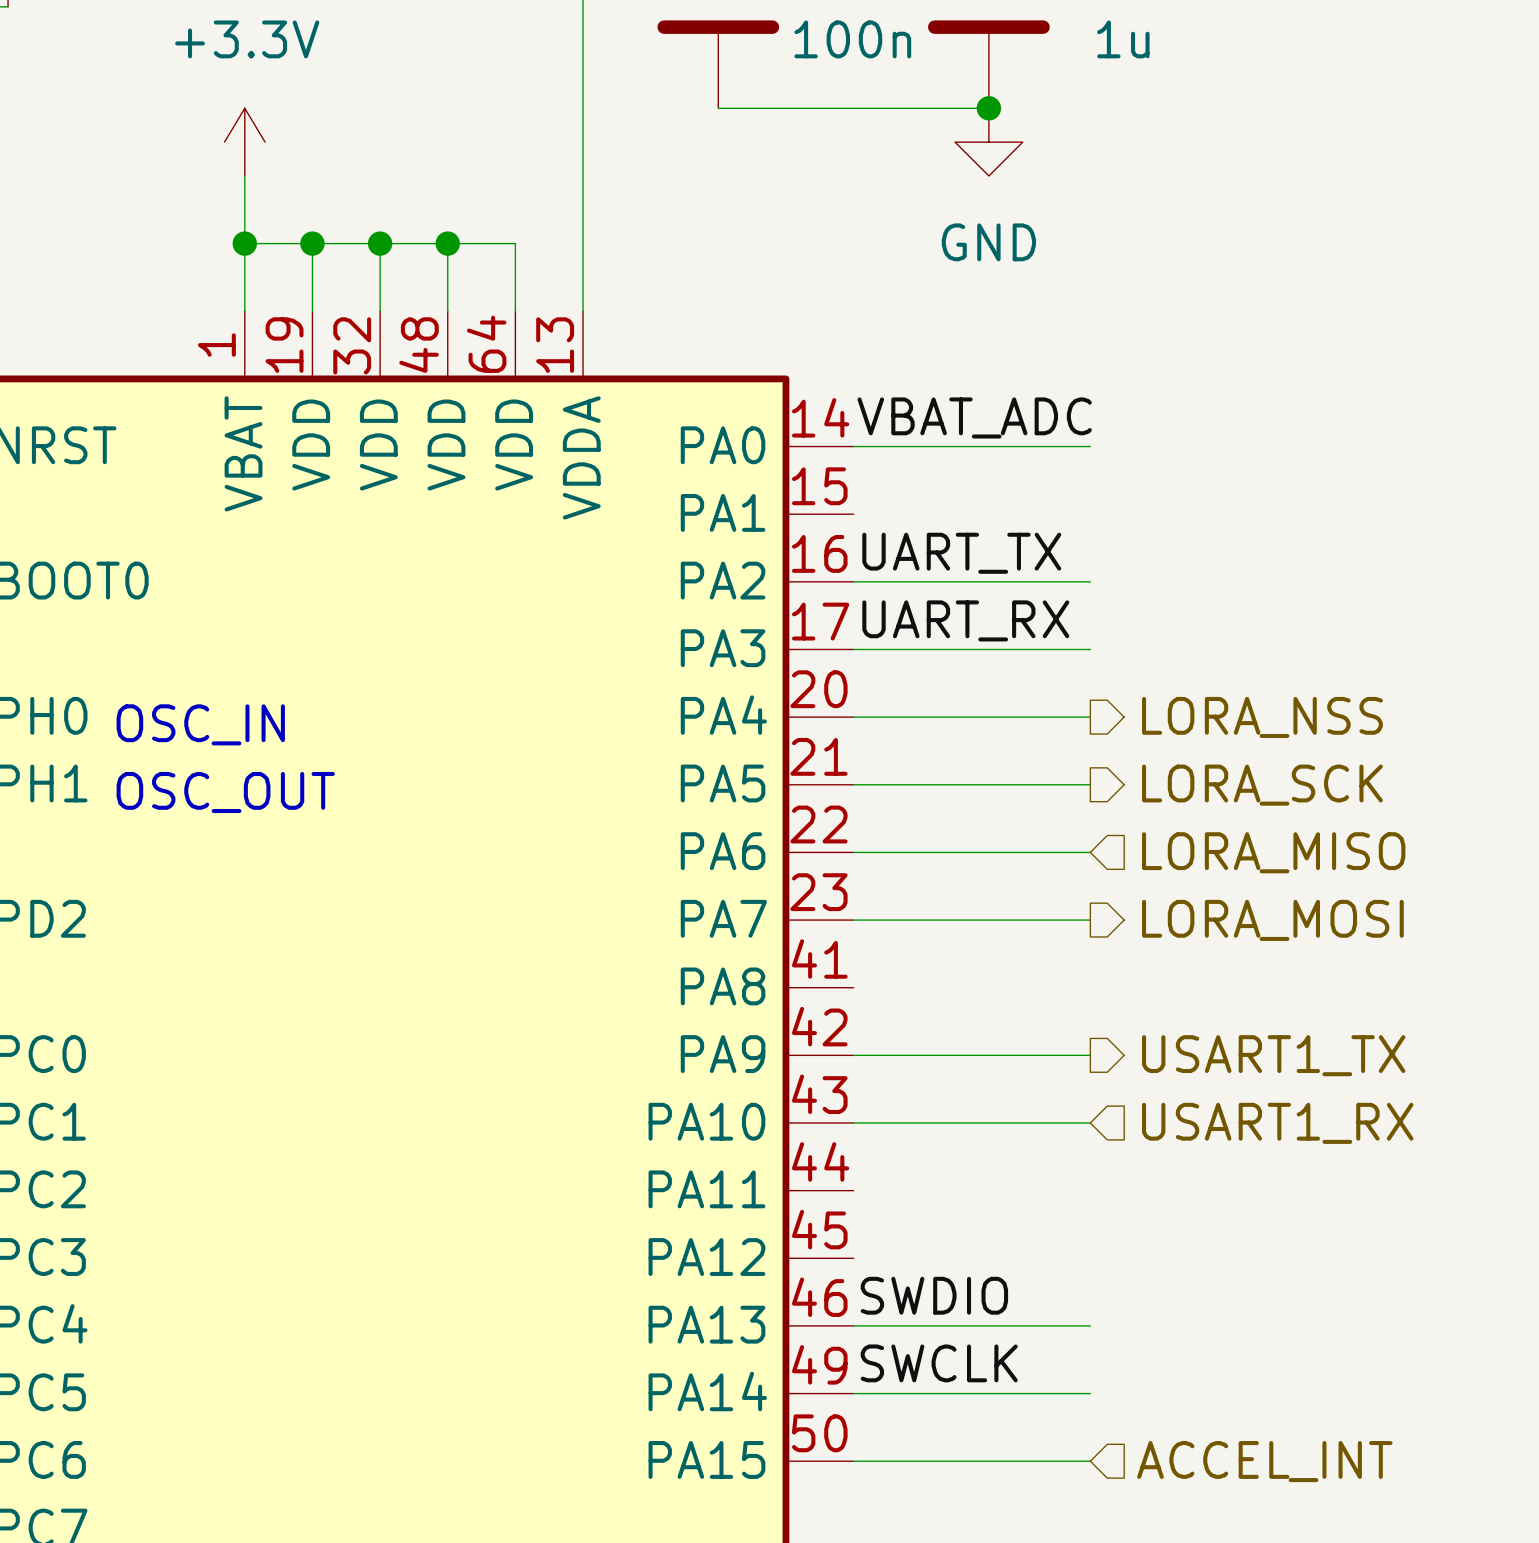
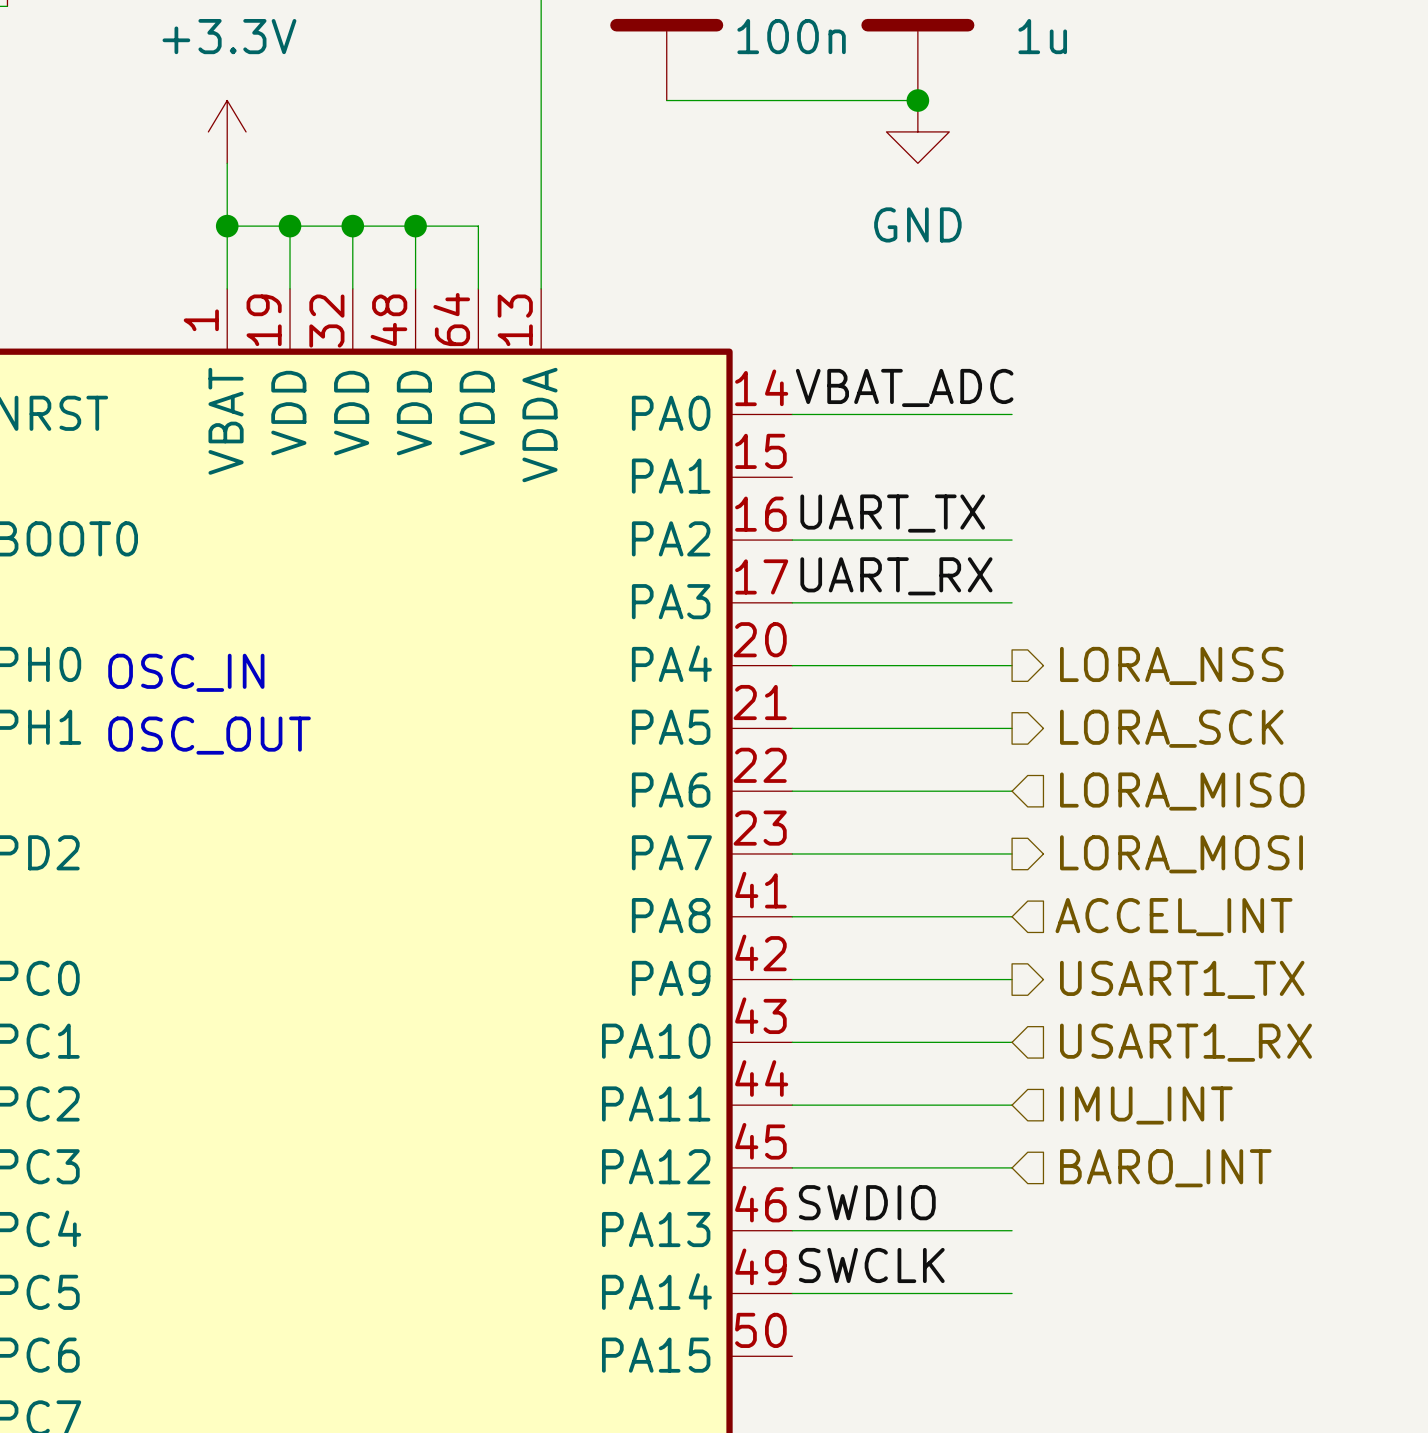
wire: none -> (792, 916) (1012, 916)
wire: none -> (792, 1105) (1012, 1105)
hierarchical label: none -> IMU_INT (1146, 1105)
hierarchical label: none -> BARO_INT (1165, 1168)
wire: (853, 1461) (1090, 1461) -> (792, 1167) (1012, 1167)
hierarchical label position: ACCEL_INT (1264, 1461) -> ACCEL_INT (1174, 917)

